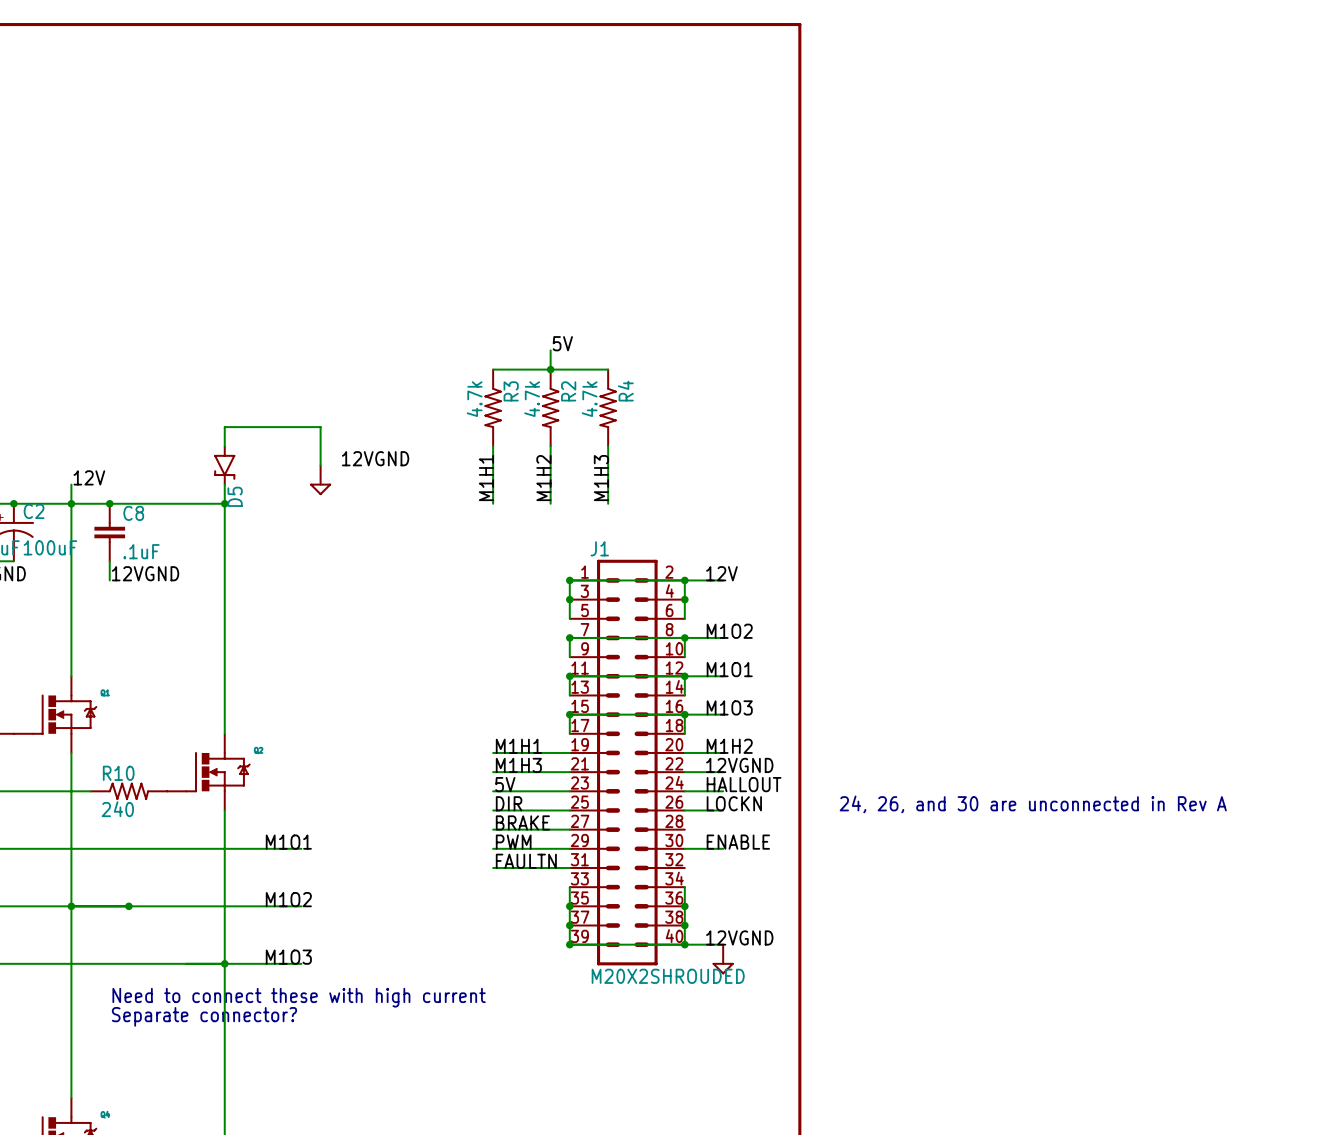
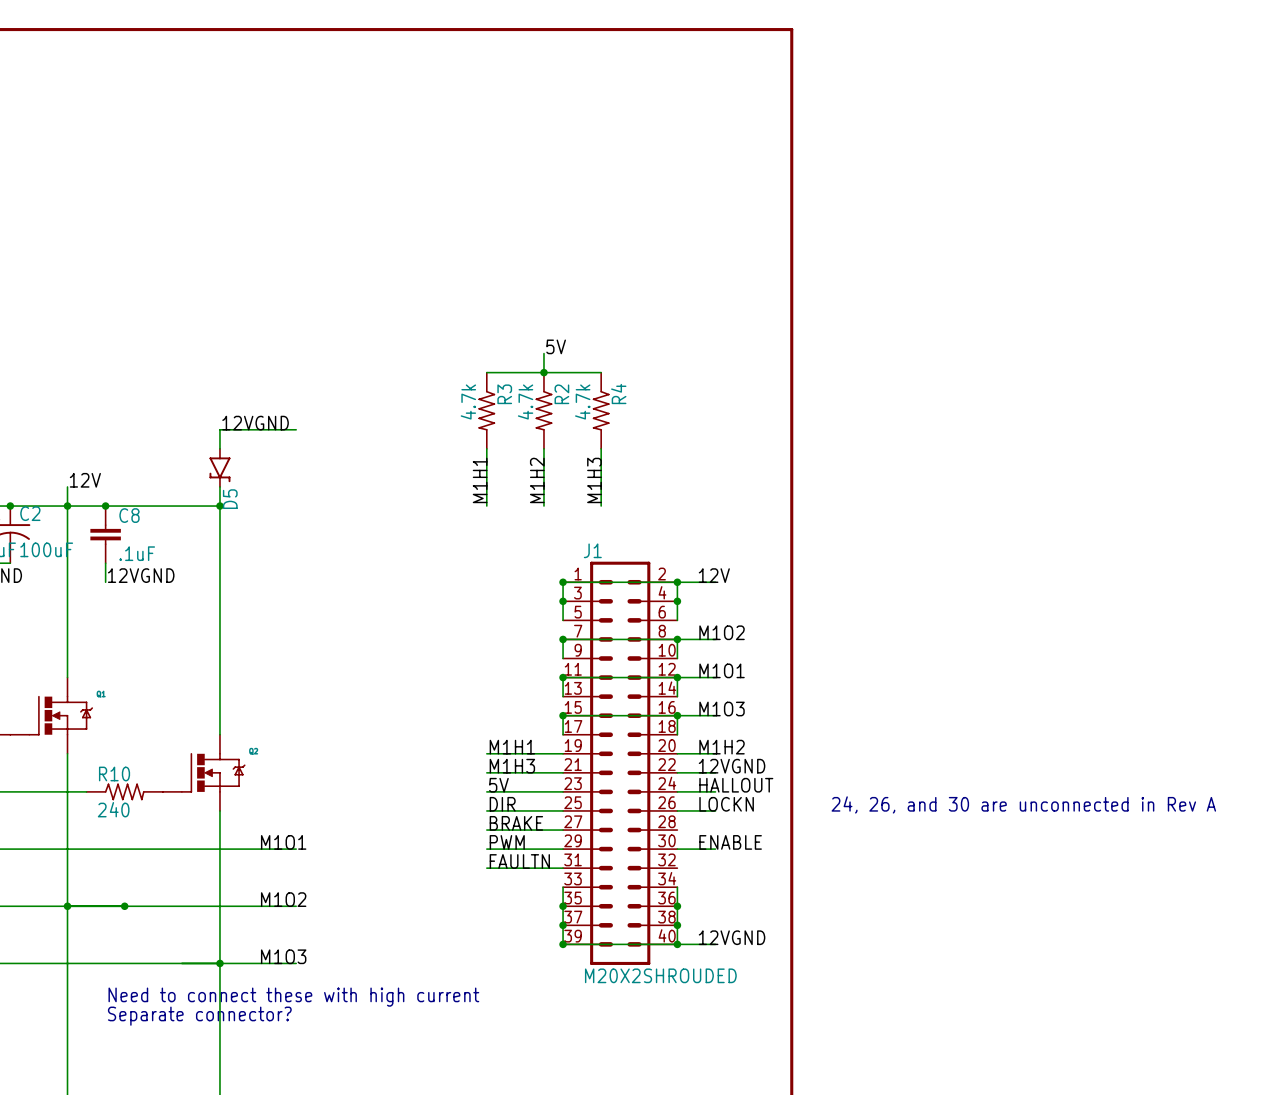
wire: (301, 427) (320, 427) (320, 465) -> none
label position: 12VGND (375, 458) -> 12VGND (255, 423)
power symbol: (320, 480) -> none
power symbol: (723, 959) -> none

